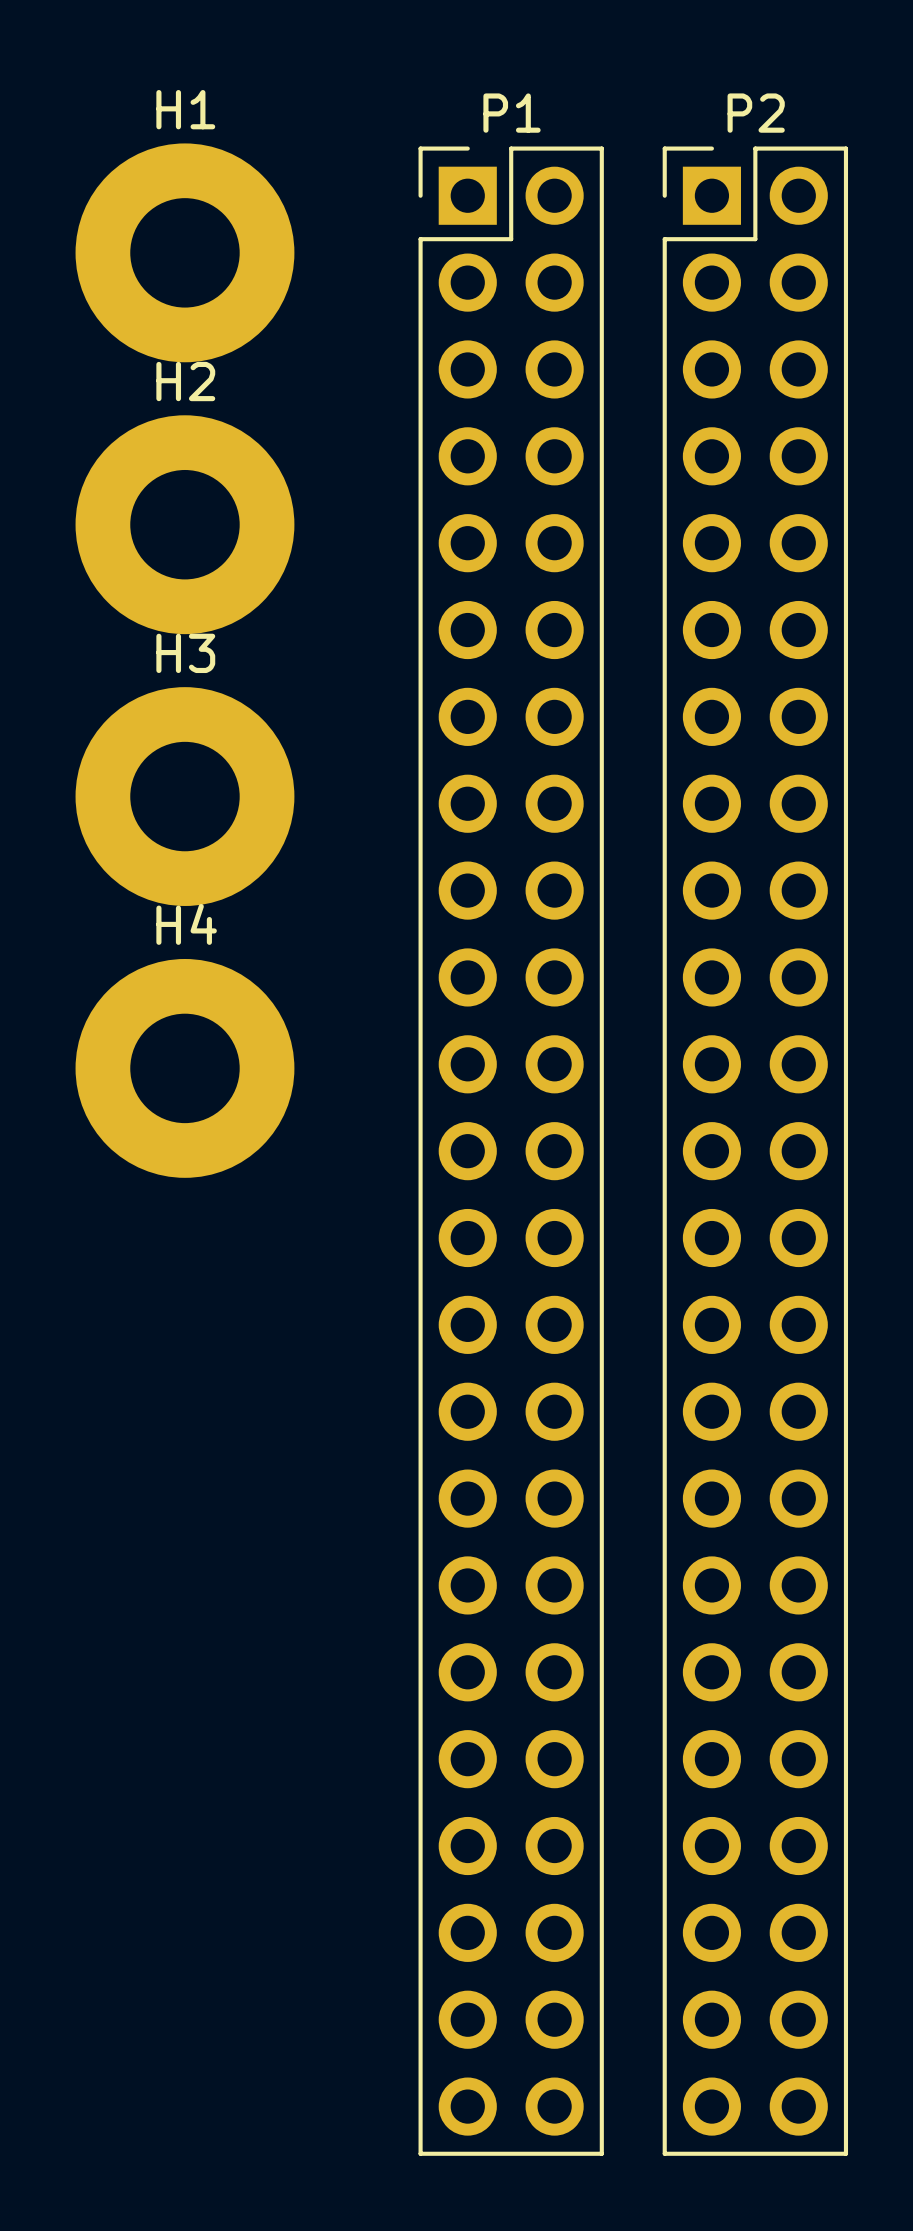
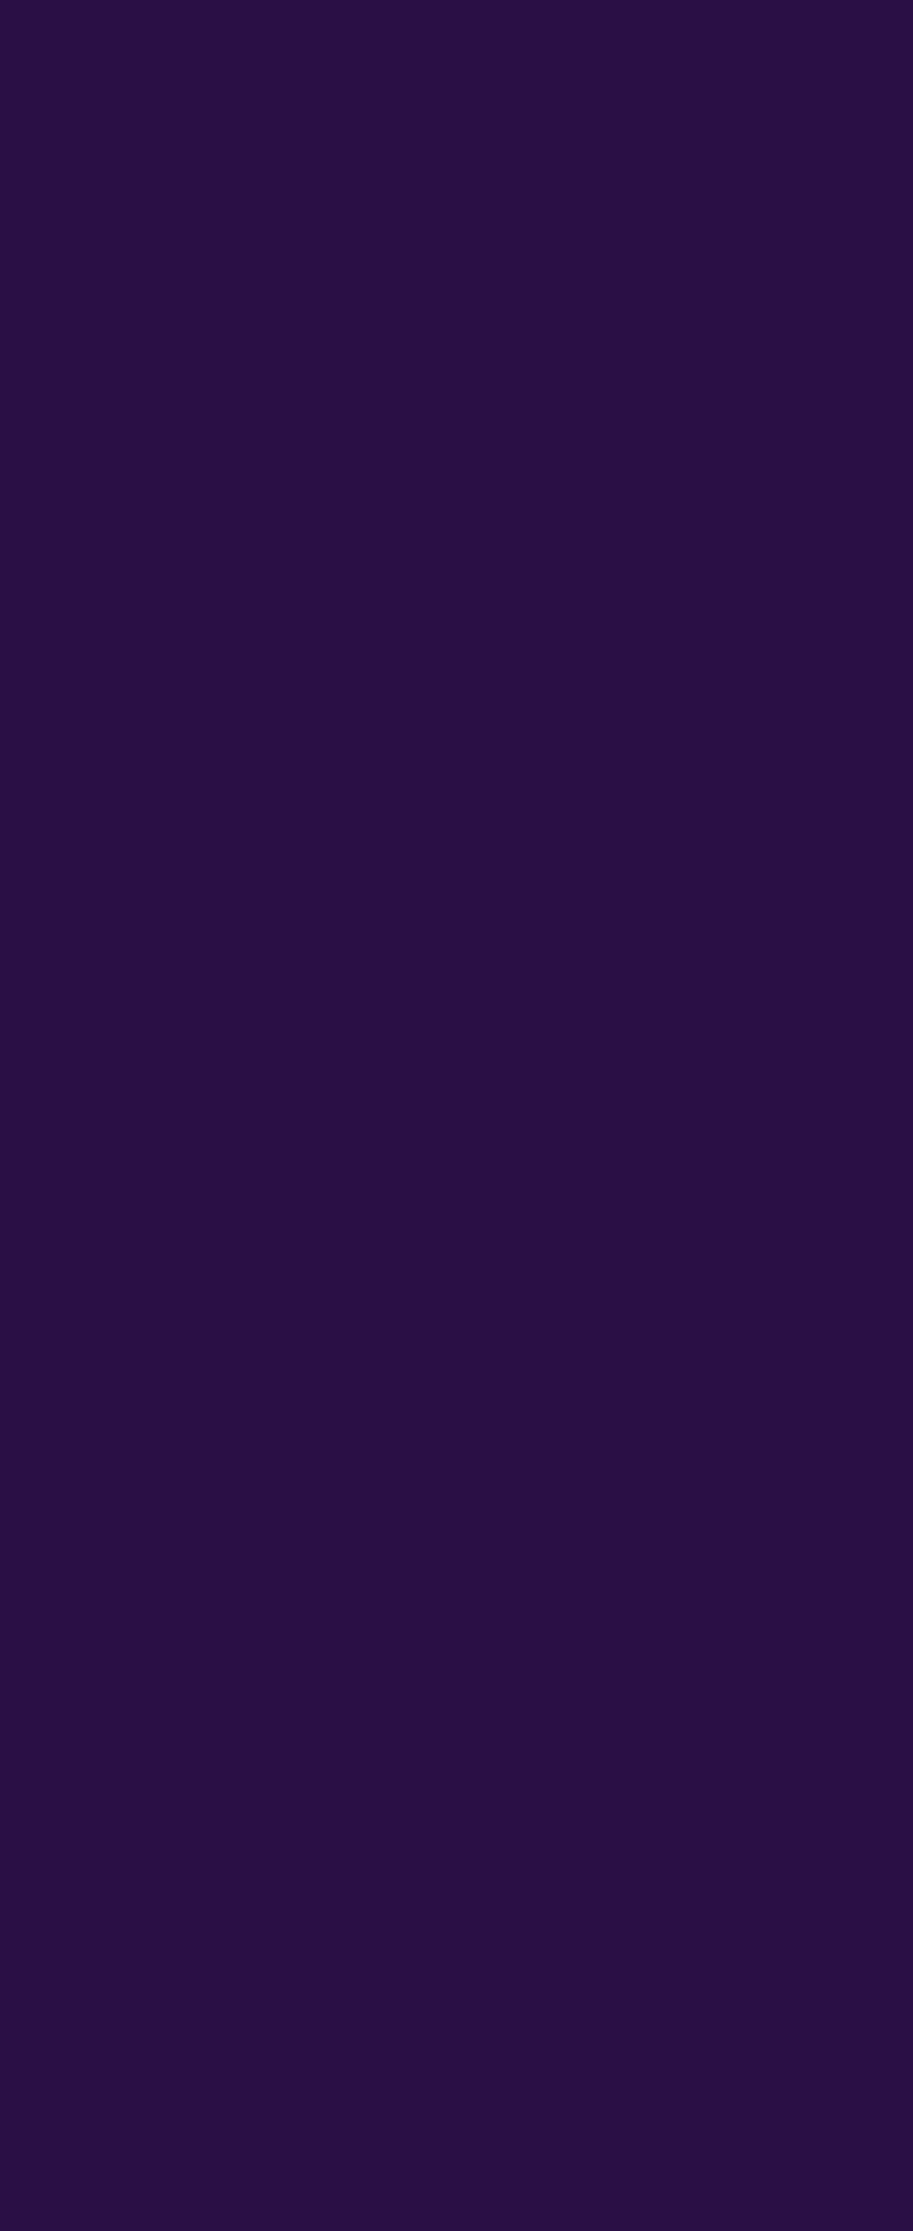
H1: (184, 252) -> none
H2: (184, 524) -> none
H3: (184, 796) -> none
H4: (184, 1068) -> none
P1: (511, 1151) -> none
P2: (755, 1151) -> none

